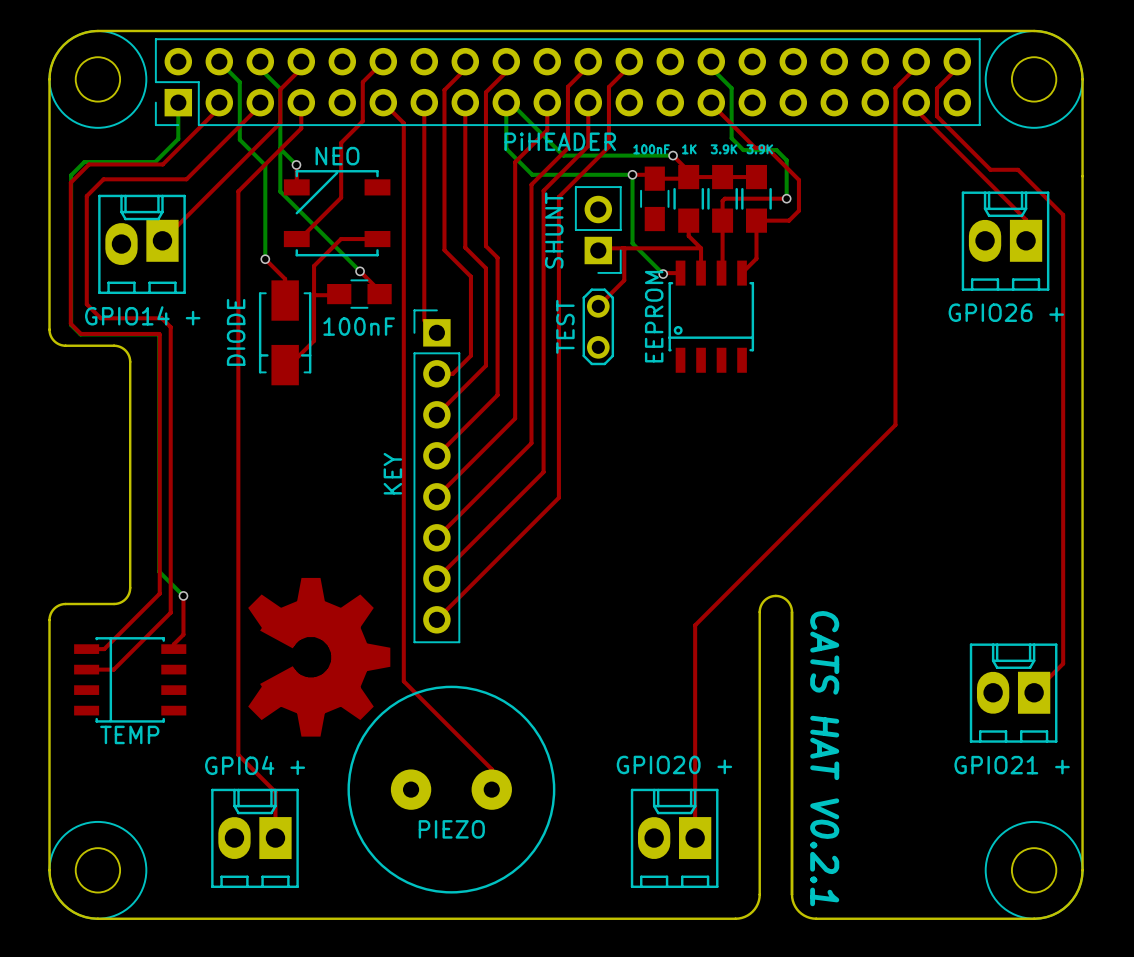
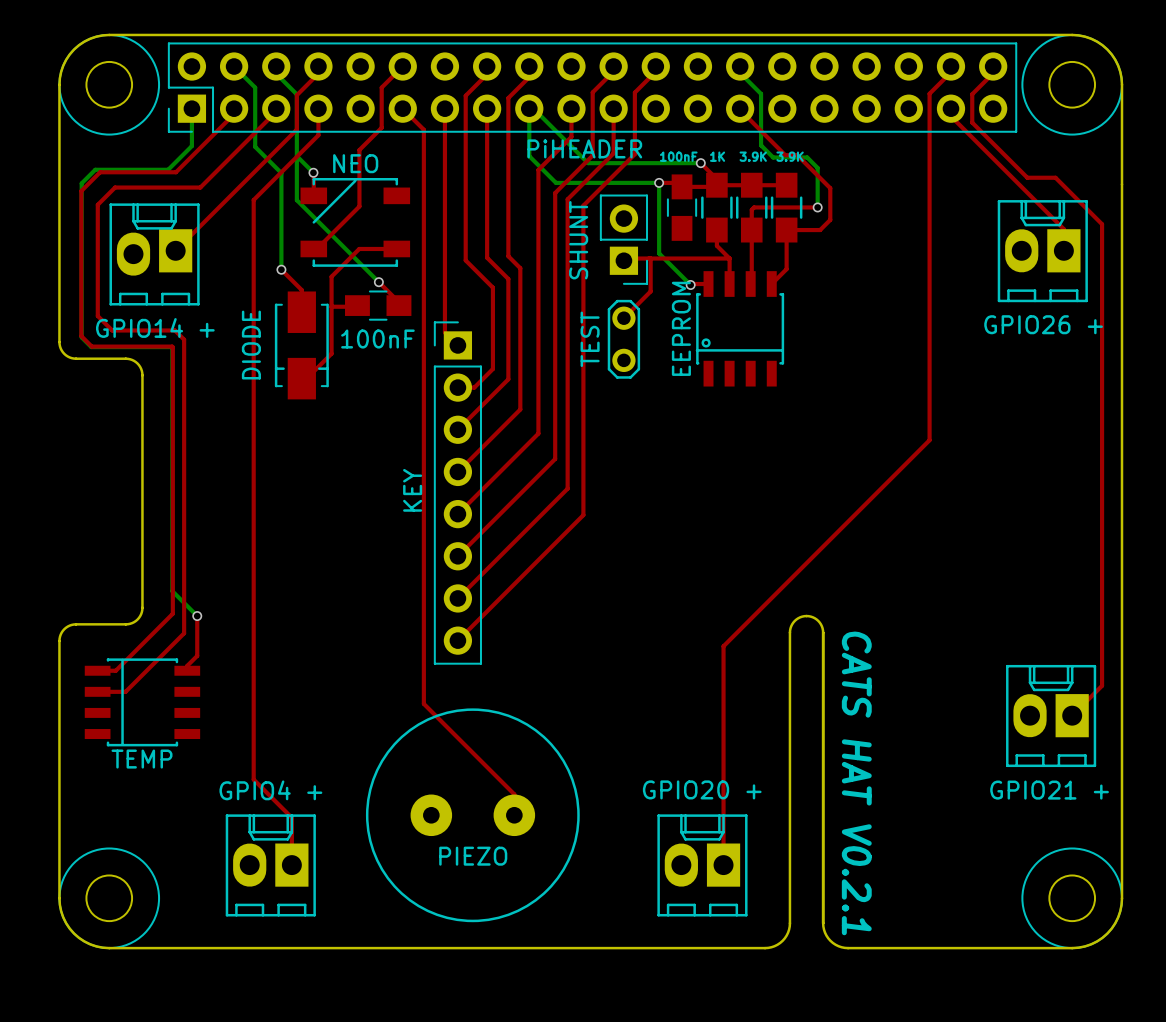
part: (319, 657) -> none

